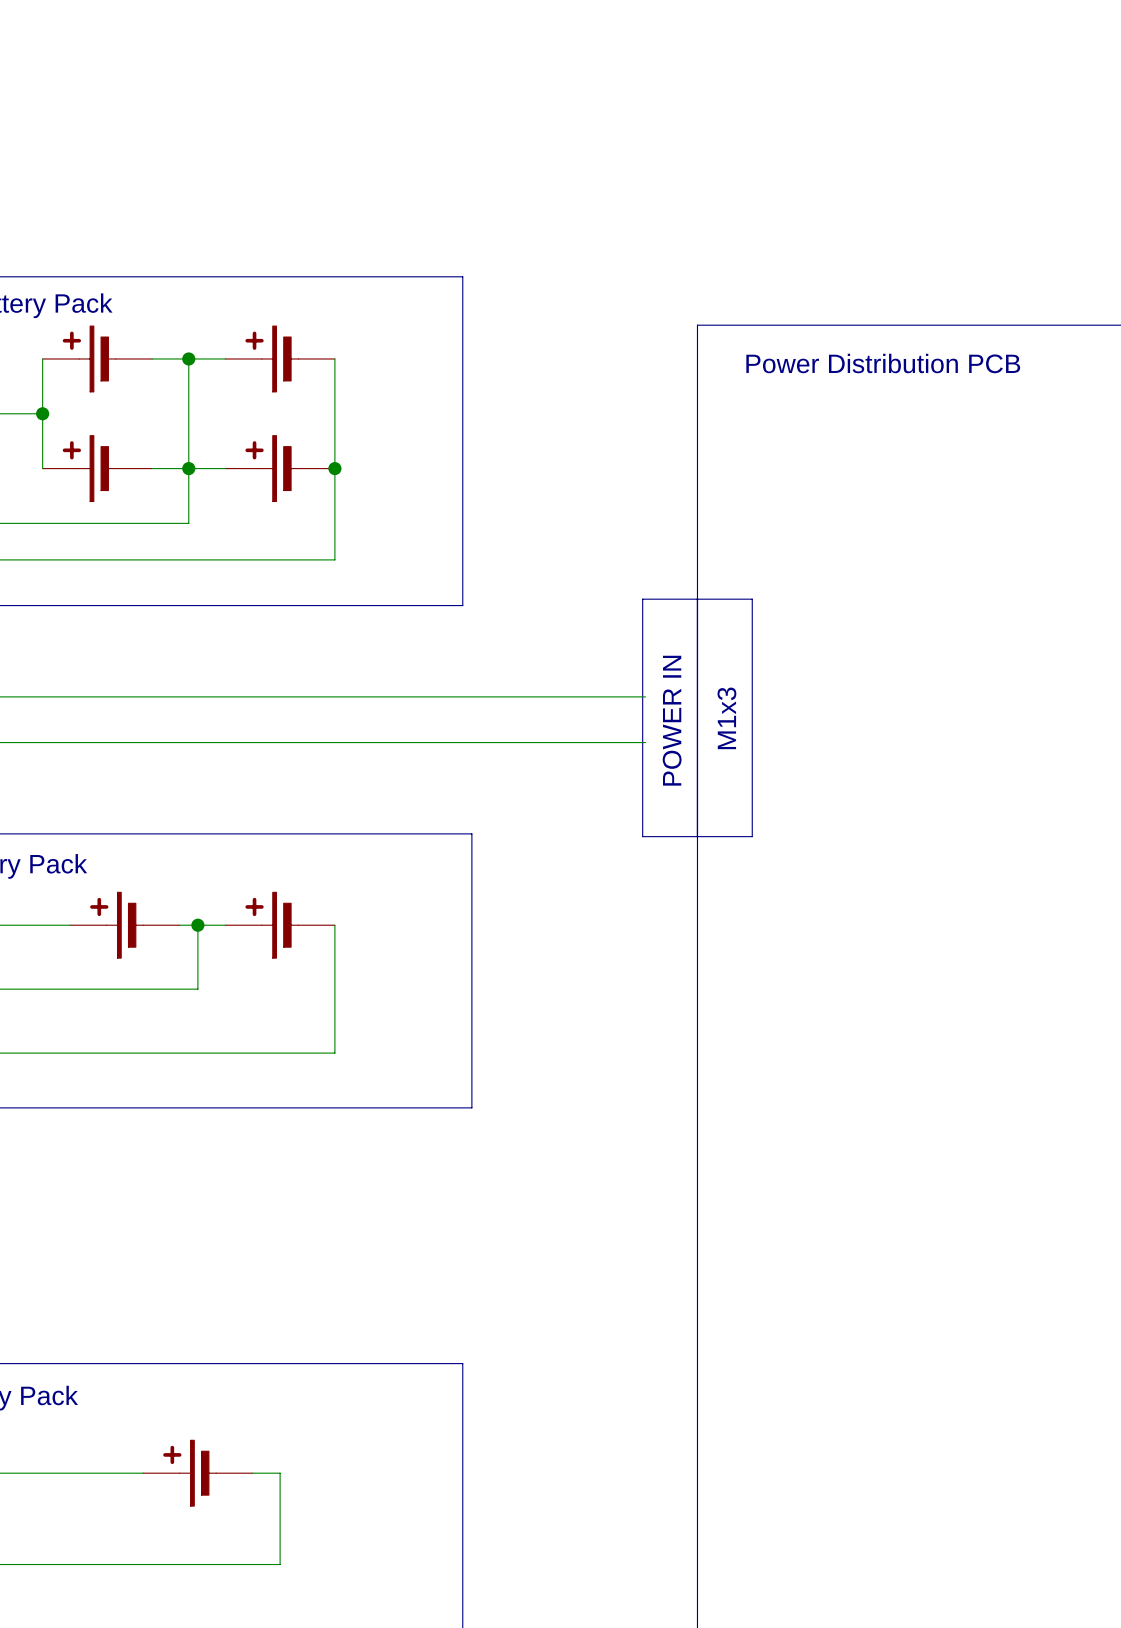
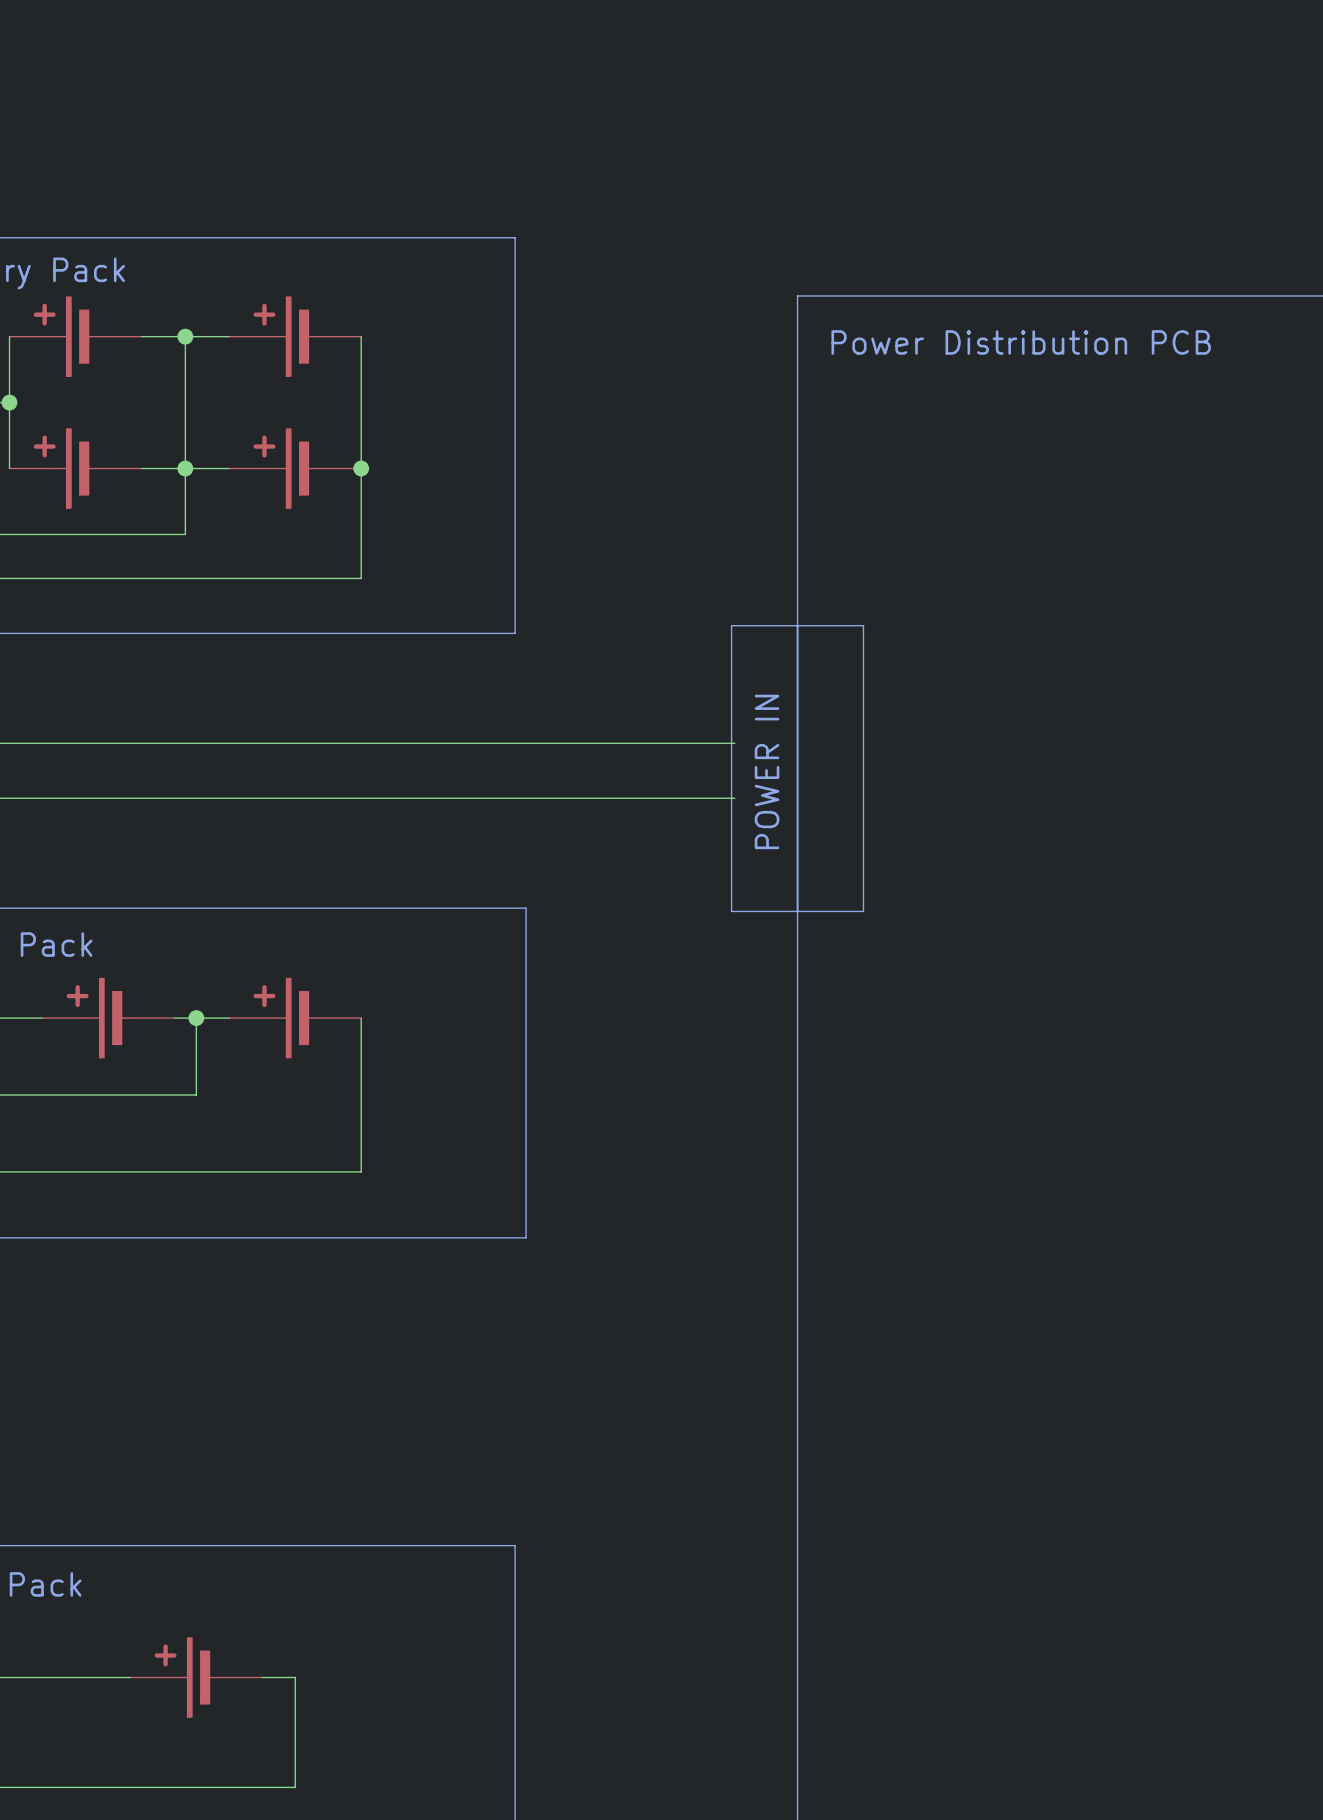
text: M1x3 (726, 718) -> none

